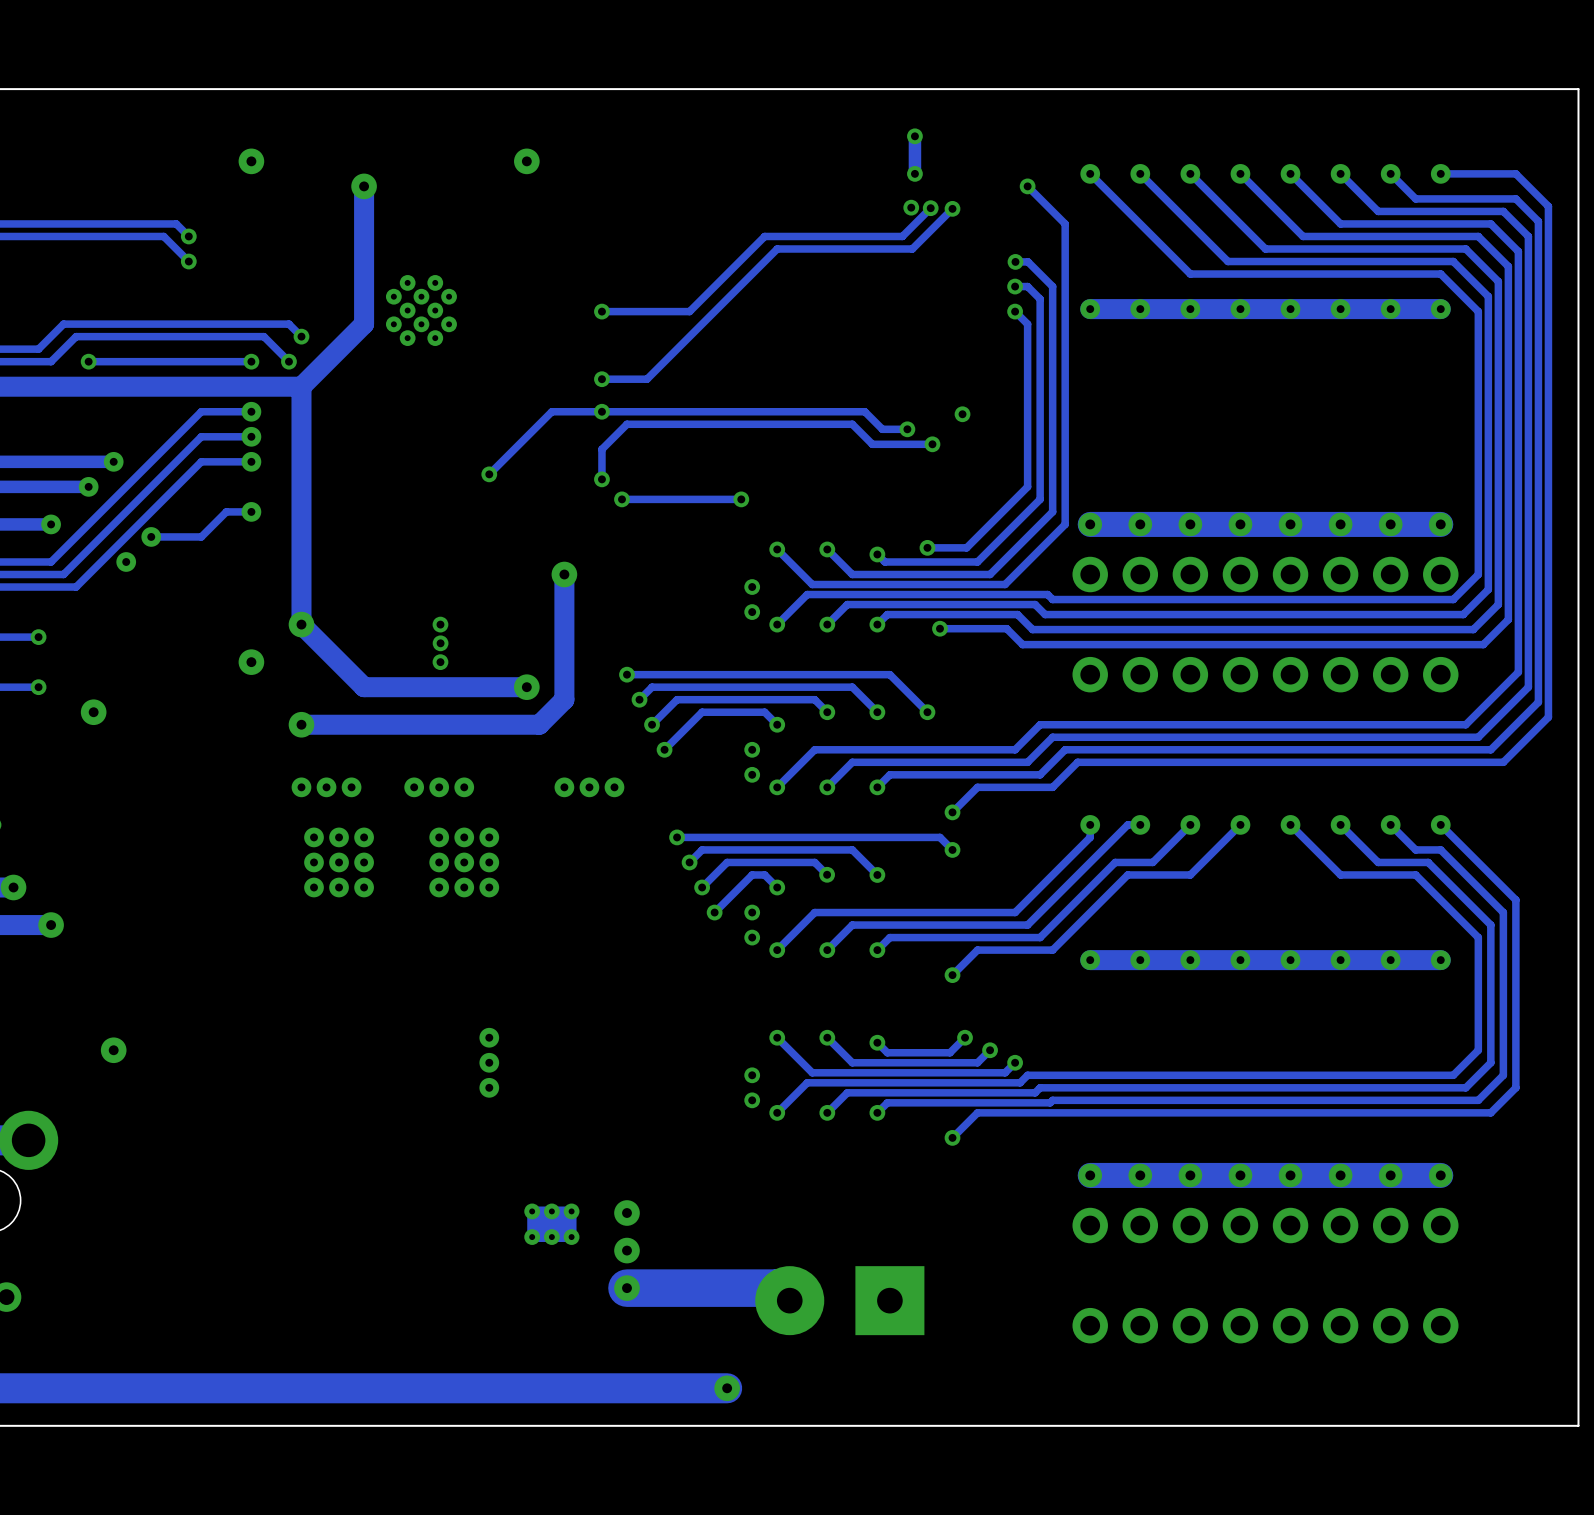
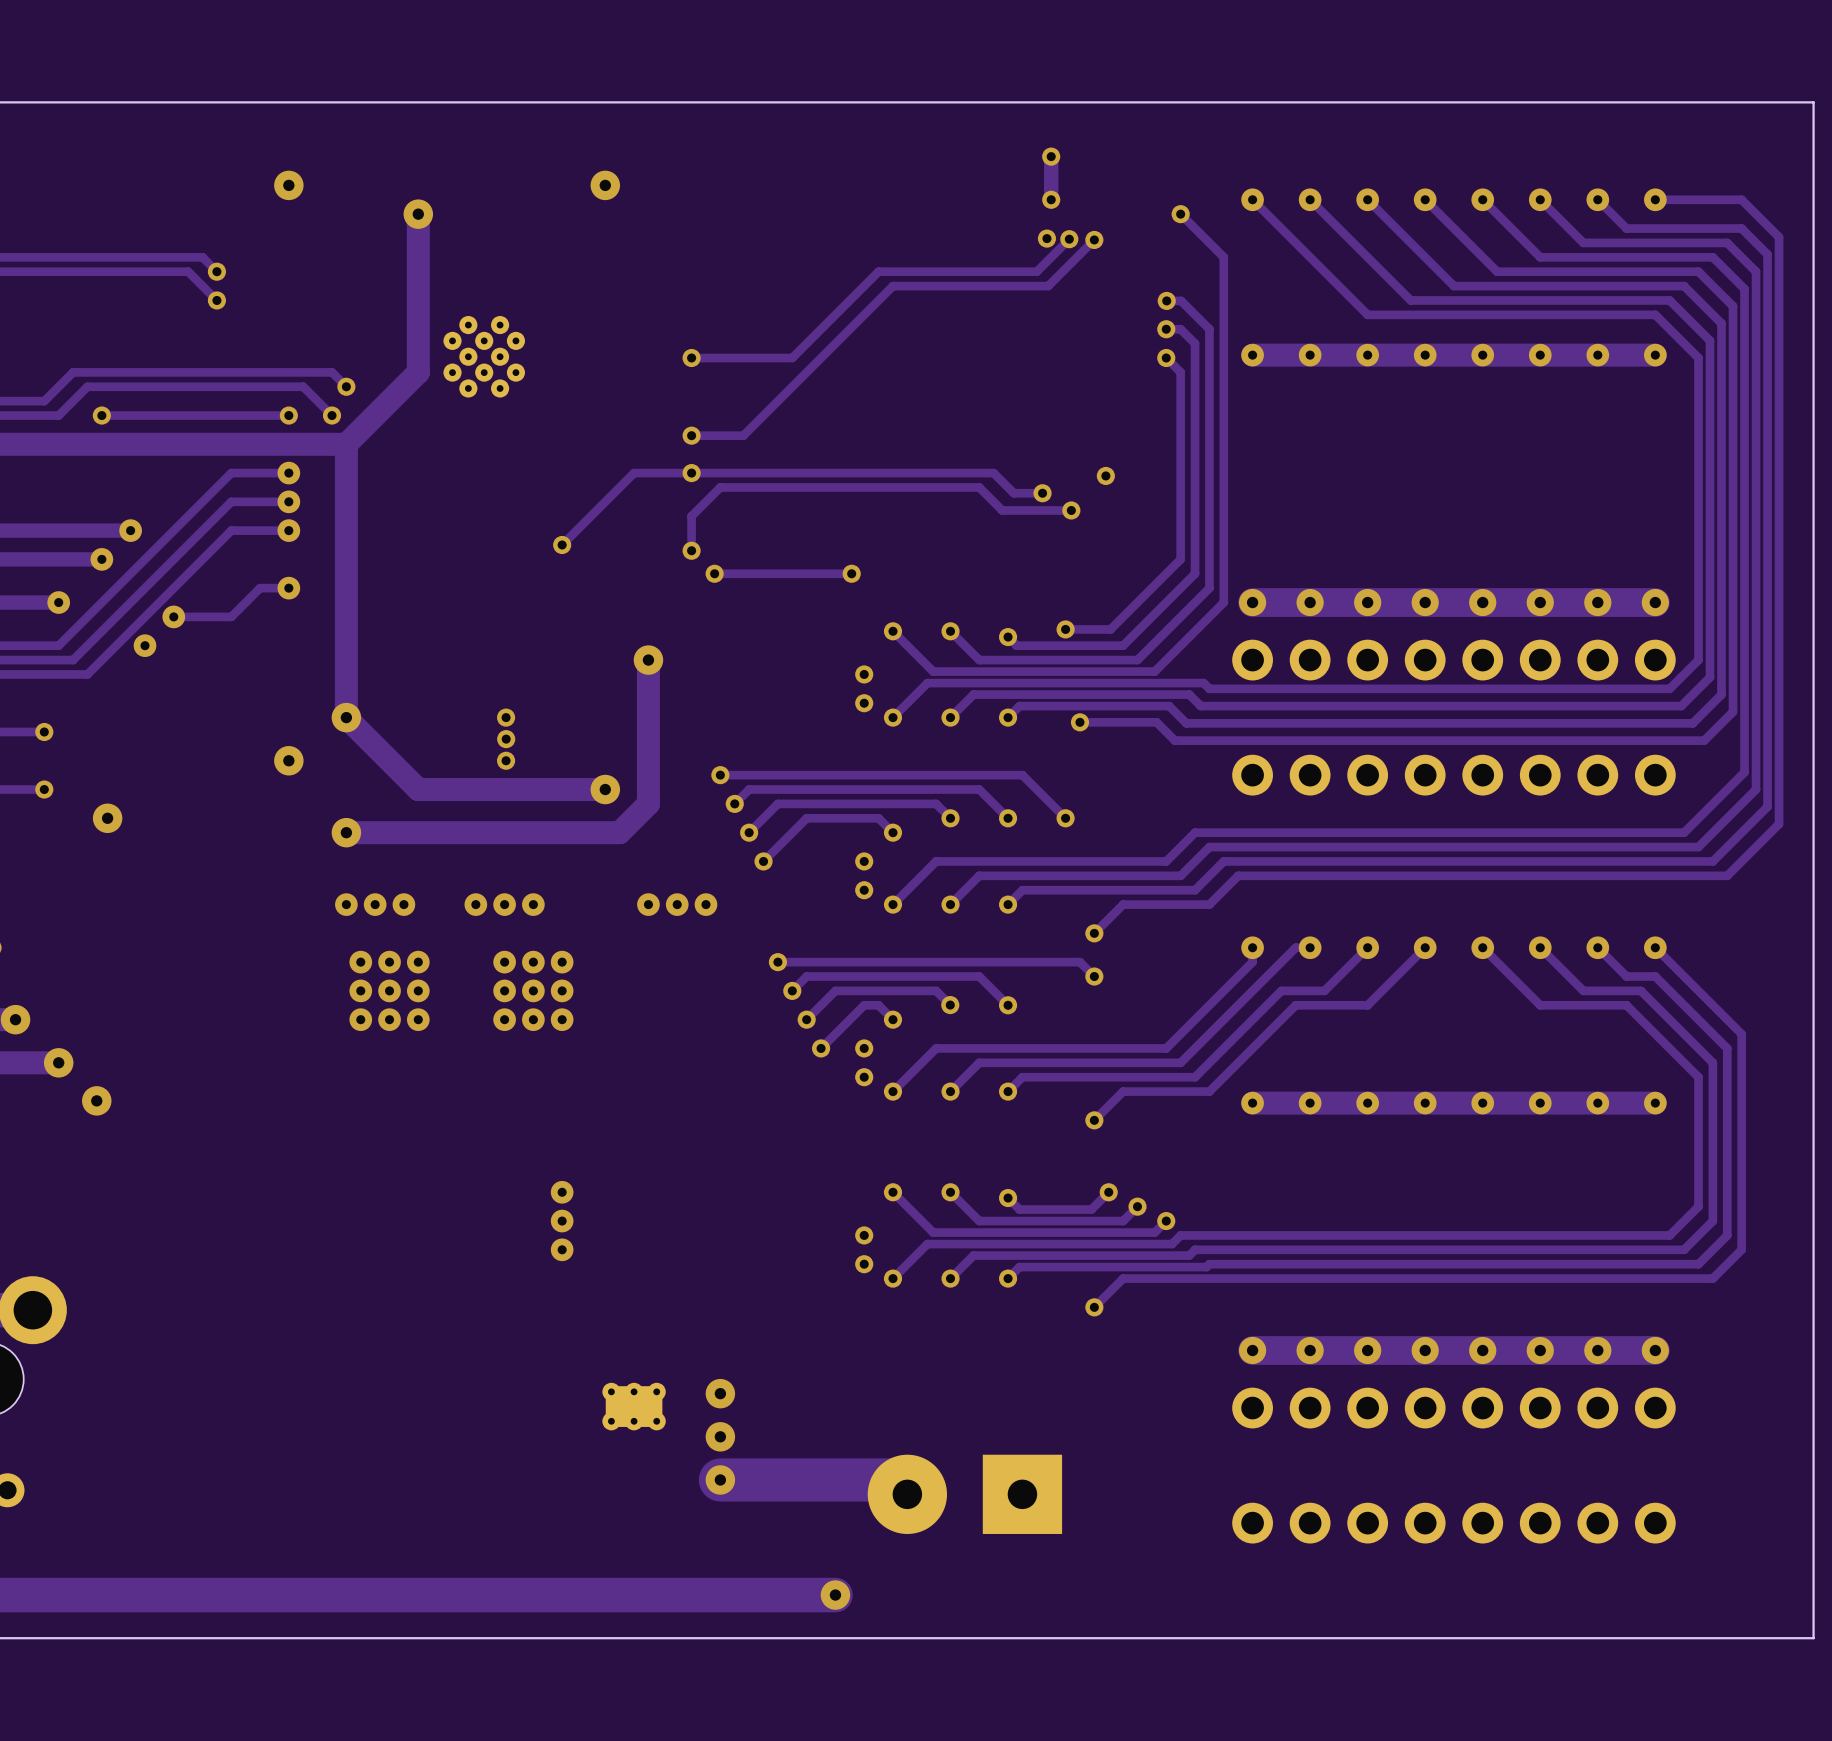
via position: (113, 1050) -> (96, 1100)

